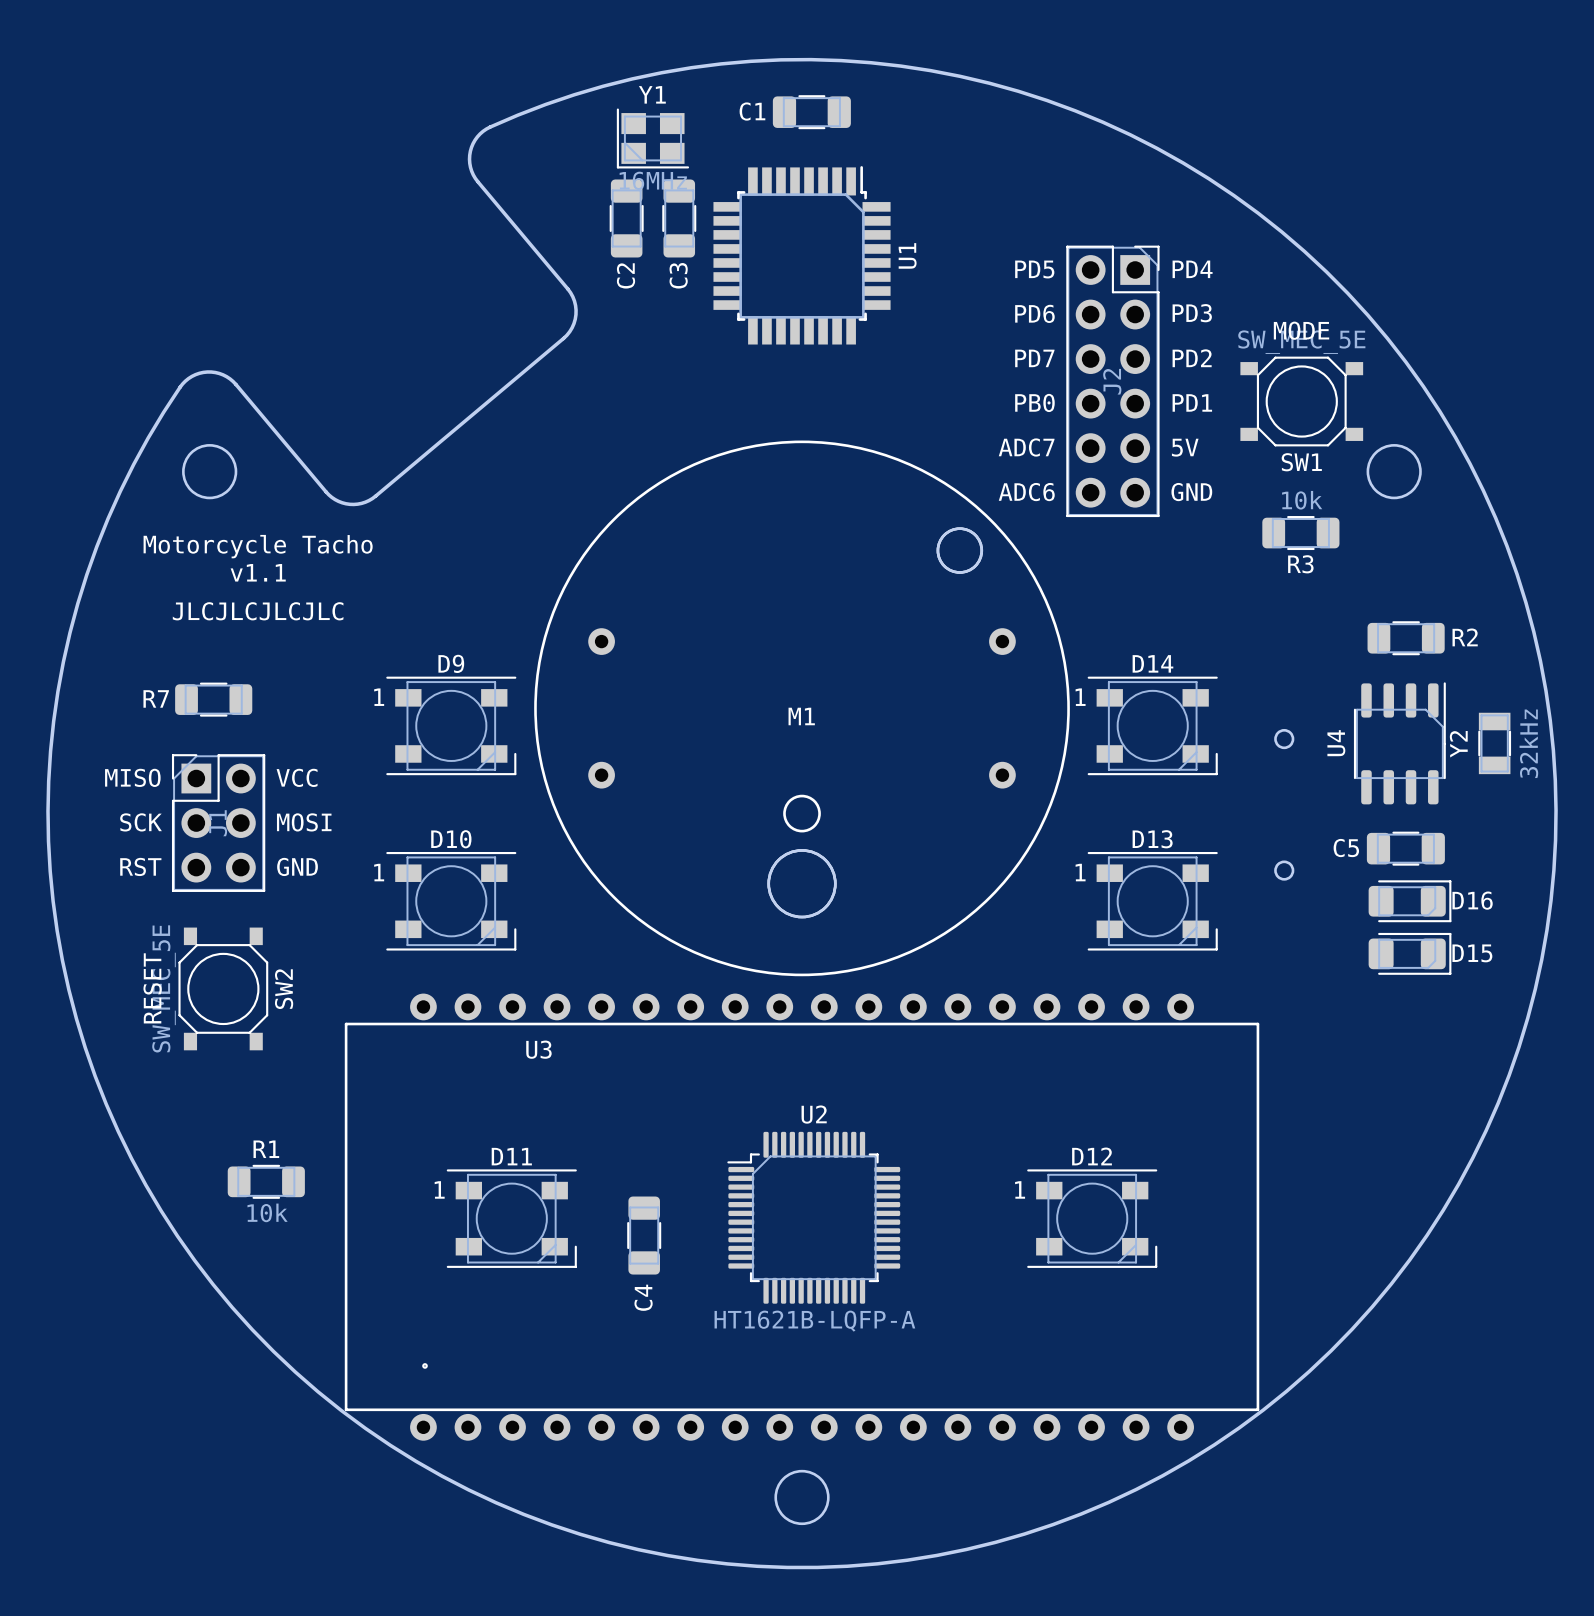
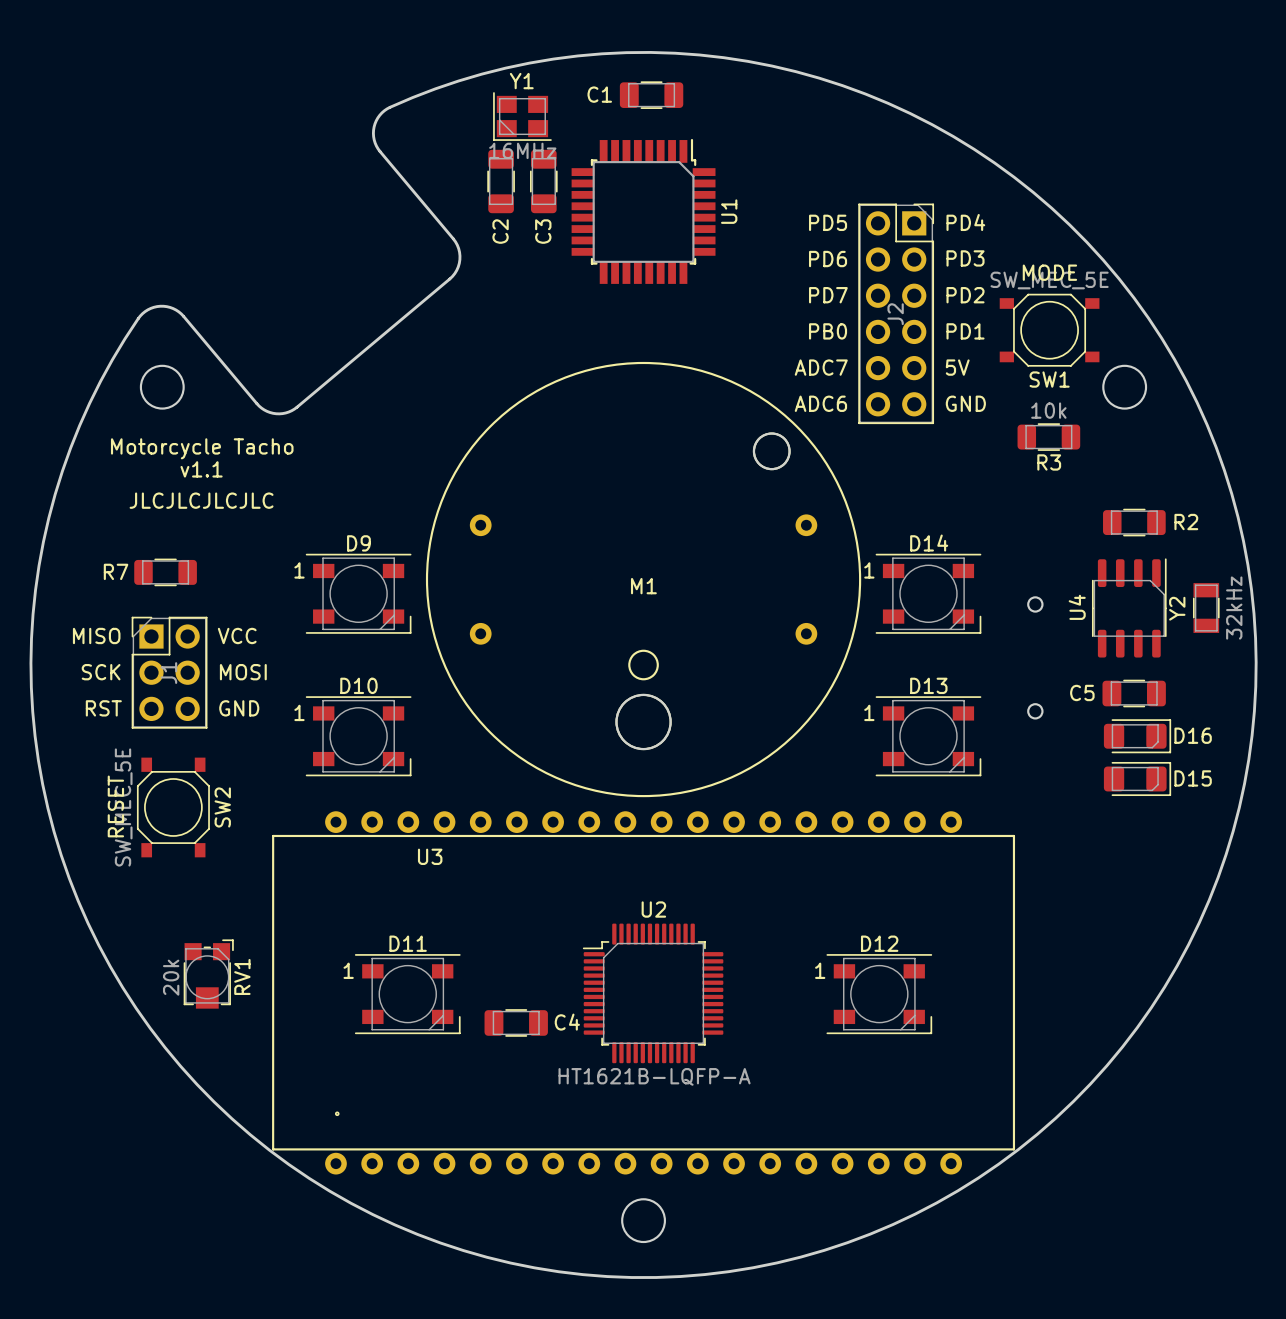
R1: 10k (266, 1181) -> none
RV1: none -> 20k (208, 974)
C4 rotation: 0° (644, 1235) -> 90° clockwise (516, 1022)
C4 name position: C4 (643, 1297) -> C4 (567, 1022)

